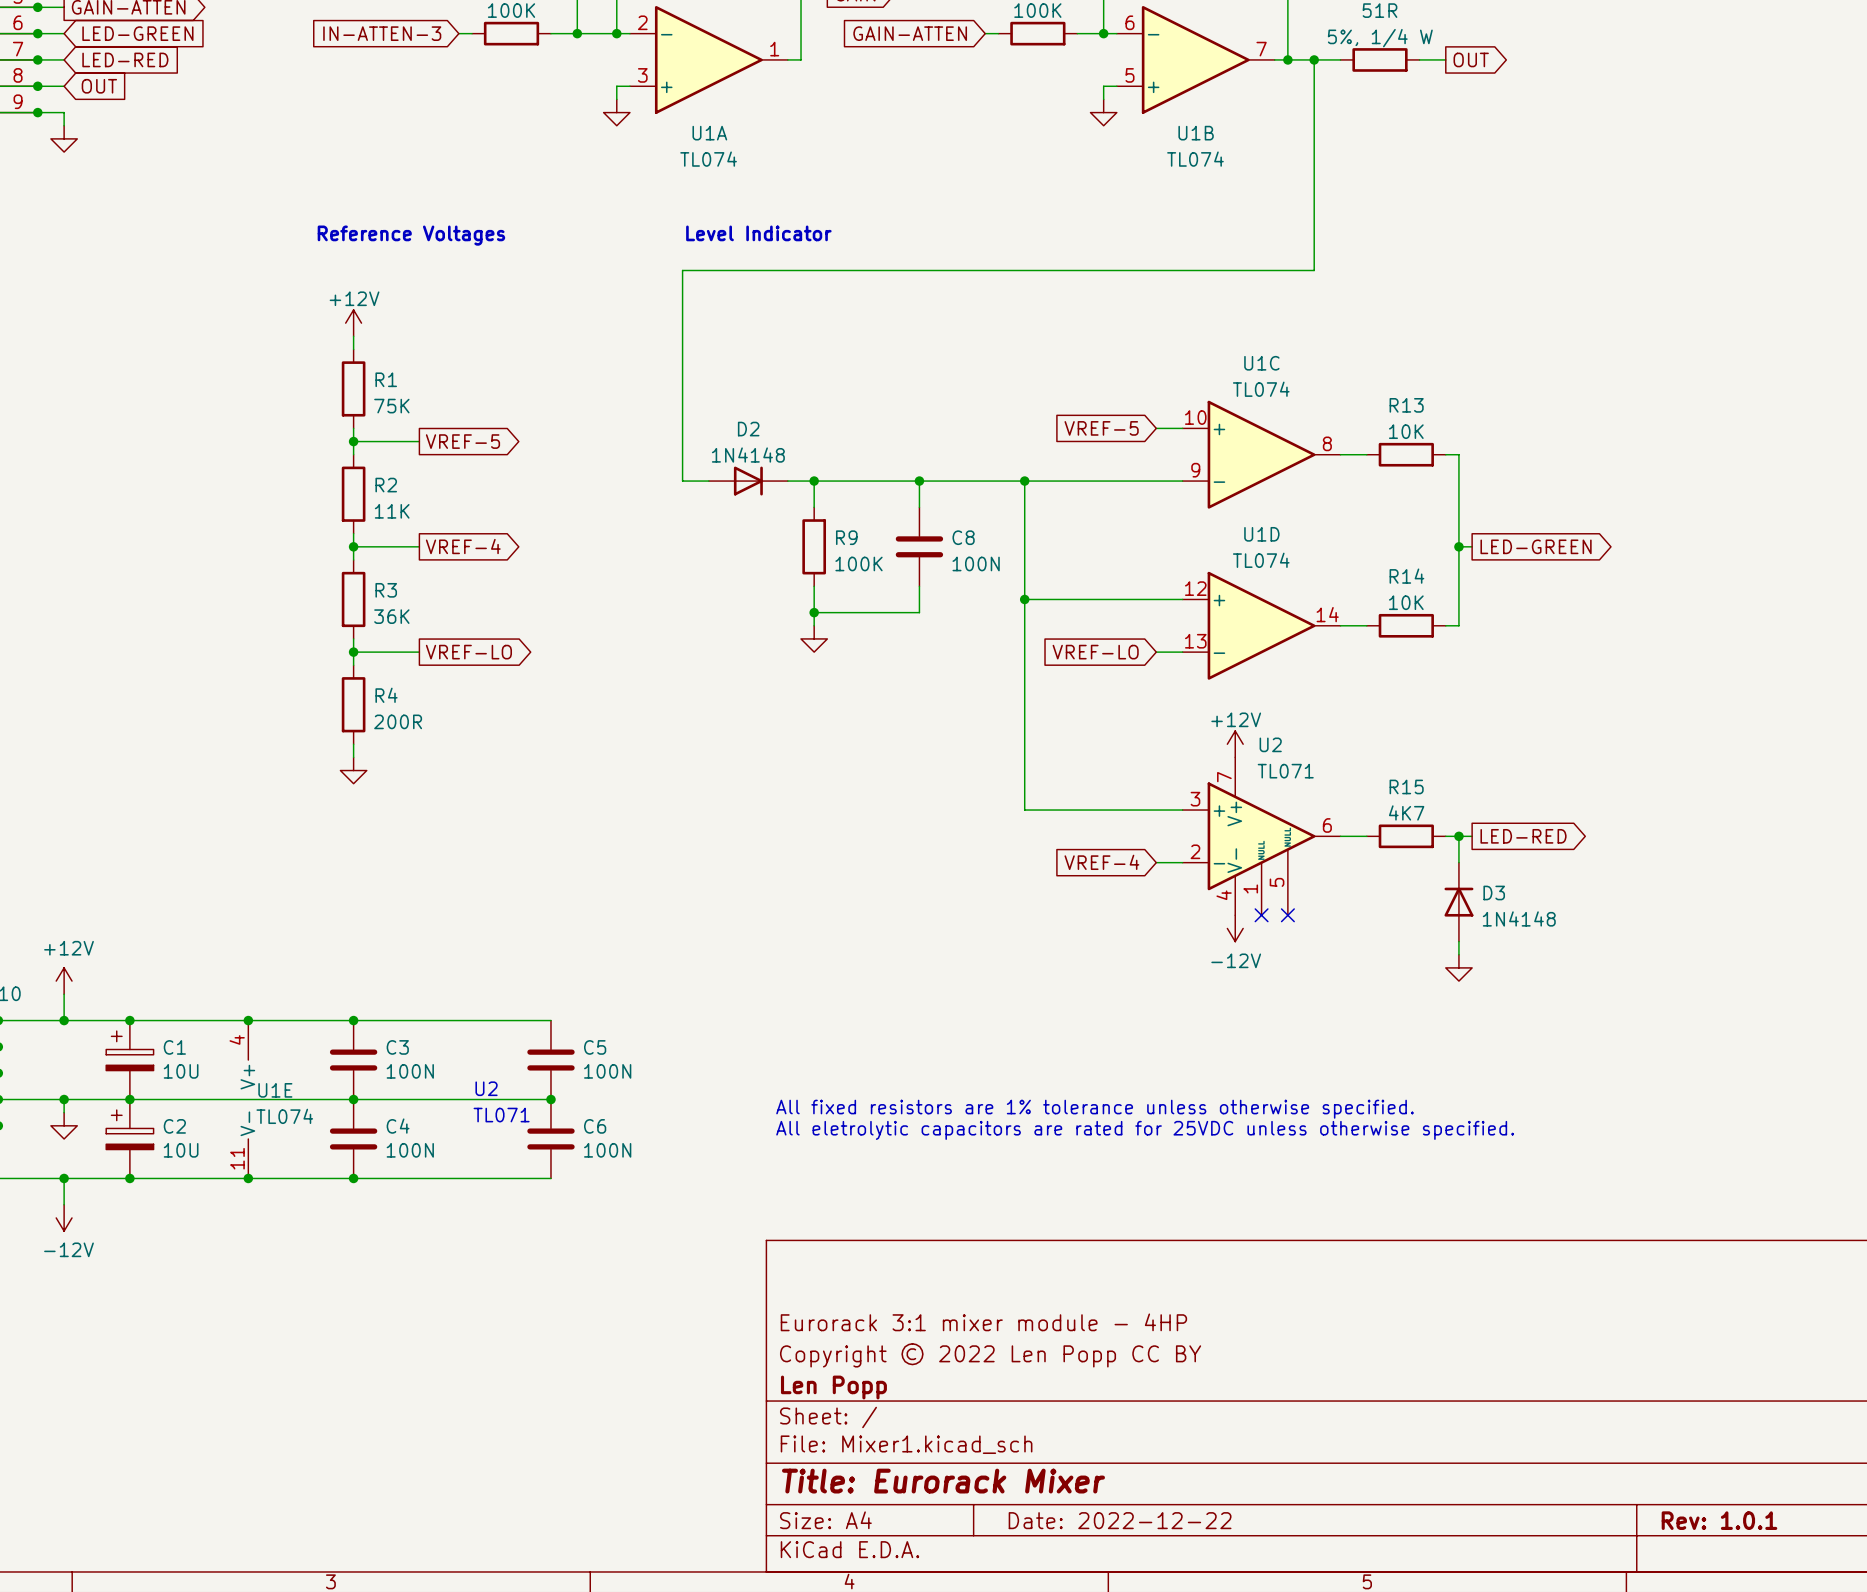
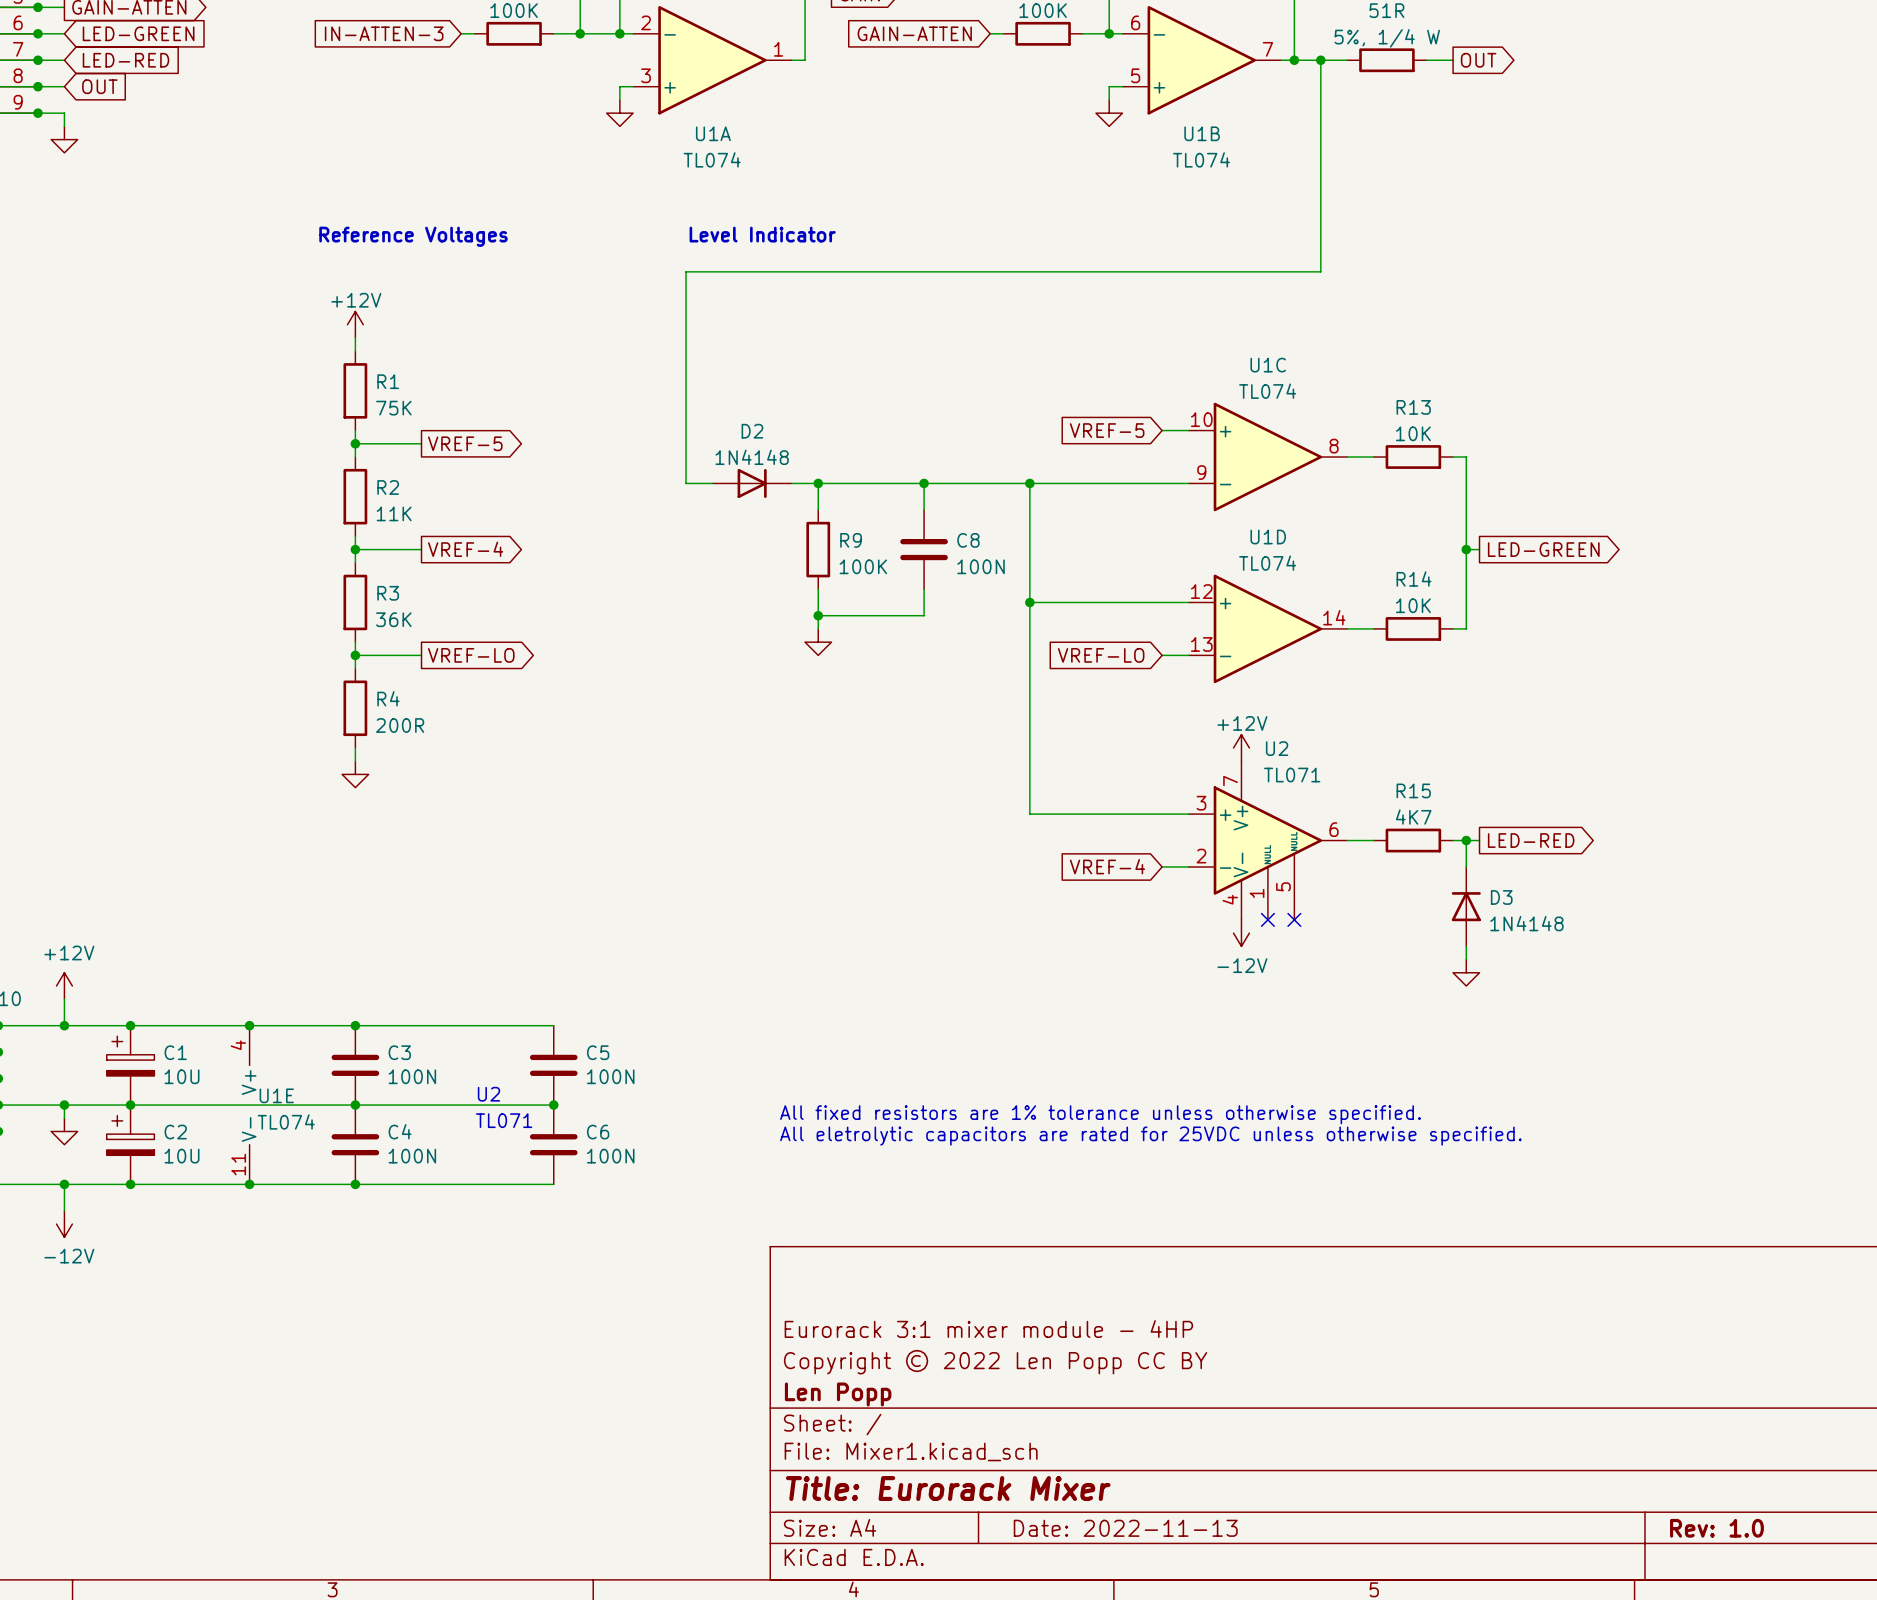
title block: Date: 2022-12-22 (1120, 1520) -> Date: 2022-11-13 (1125, 1528)
title block: Rev: 1.0.1 (1719, 1520) -> Rev: 1.0 (1716, 1528)

